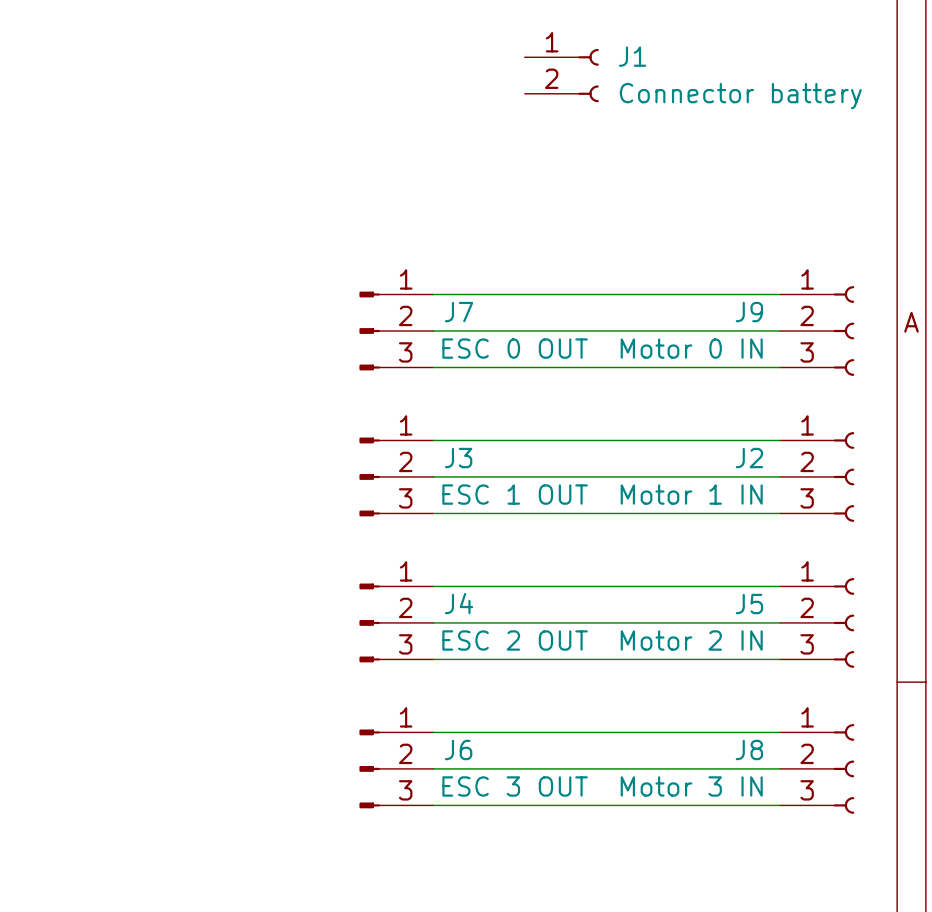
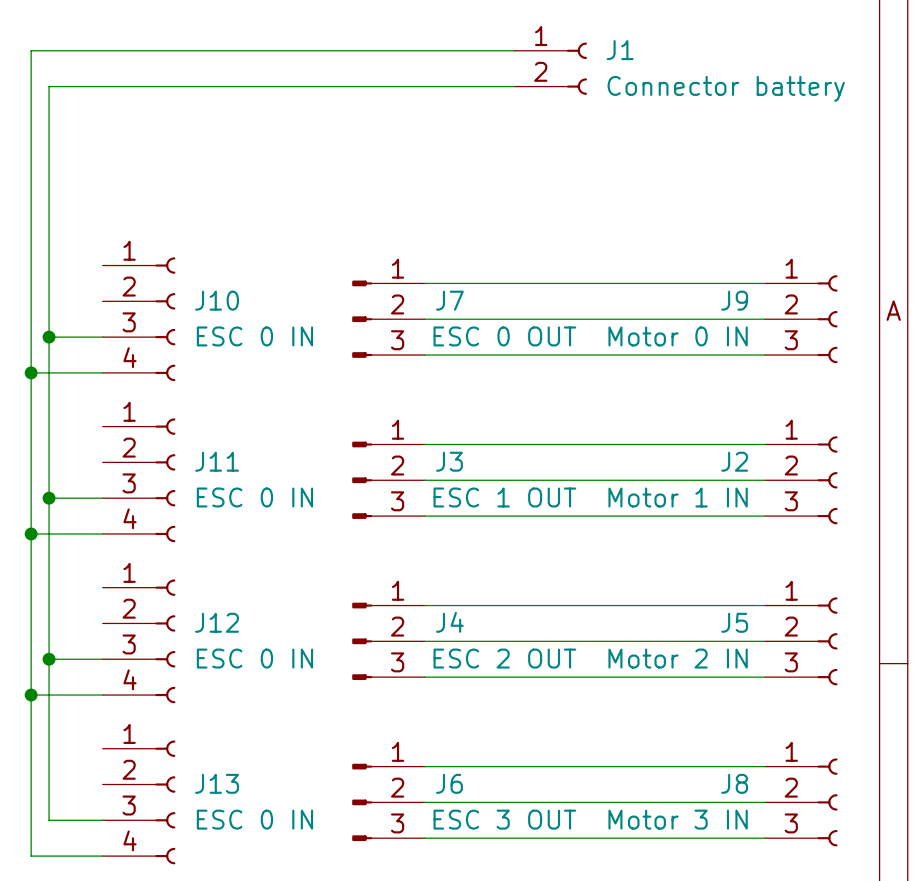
wire: none -> (514, 50) (31, 50) (31, 856) (102, 856)
wire: none -> (514, 86) (49, 86) (49, 820) (102, 820)
J10: none -> ESC 0 IN (139, 319)
wire: none -> (49, 337) (102, 337)
junction: none -> (49, 337)
wire: none -> (31, 372) (102, 372)
junction: none -> (31, 372)
wire: (433, 440) (780, 440) -> (424, 444) (764, 444)
J3 position: (396, 476) -> (388, 480)
wire: (433, 476) (780, 476) -> (424, 480) (764, 480)
J2 position: (817, 476) -> (801, 480)
J11: none -> ESC 0 IN (139, 480)
wire: none -> (49, 498) (102, 498)
junction: none -> (49, 498)
wire: (433, 513) (780, 513) -> (424, 516) (764, 516)
wire: none -> (31, 533) (102, 533)
junction: none -> (31, 533)
wire: (433, 586) (780, 586) -> (424, 838) (764, 838)
J4 position: (396, 622) -> (388, 641)
J5 position: (817, 622) -> (801, 641)
J12: none -> ESC 0 IN (139, 641)
wire: none -> (49, 659) (102, 659)
junction: none -> (49, 659)
wire: none -> (31, 695) (102, 695)
junction: none -> (31, 695)
wire: (433, 732) (780, 732) -> (424, 677) (764, 677)
J6 position: (396, 768) -> (388, 802)
wire: (433, 768) (780, 768) -> (424, 766) (764, 766)
J8 position: (817, 768) -> (801, 802)
wire: (433, 805) (780, 805) -> (424, 802) (764, 802)
J13: none -> ESC 0 IN (139, 802)

